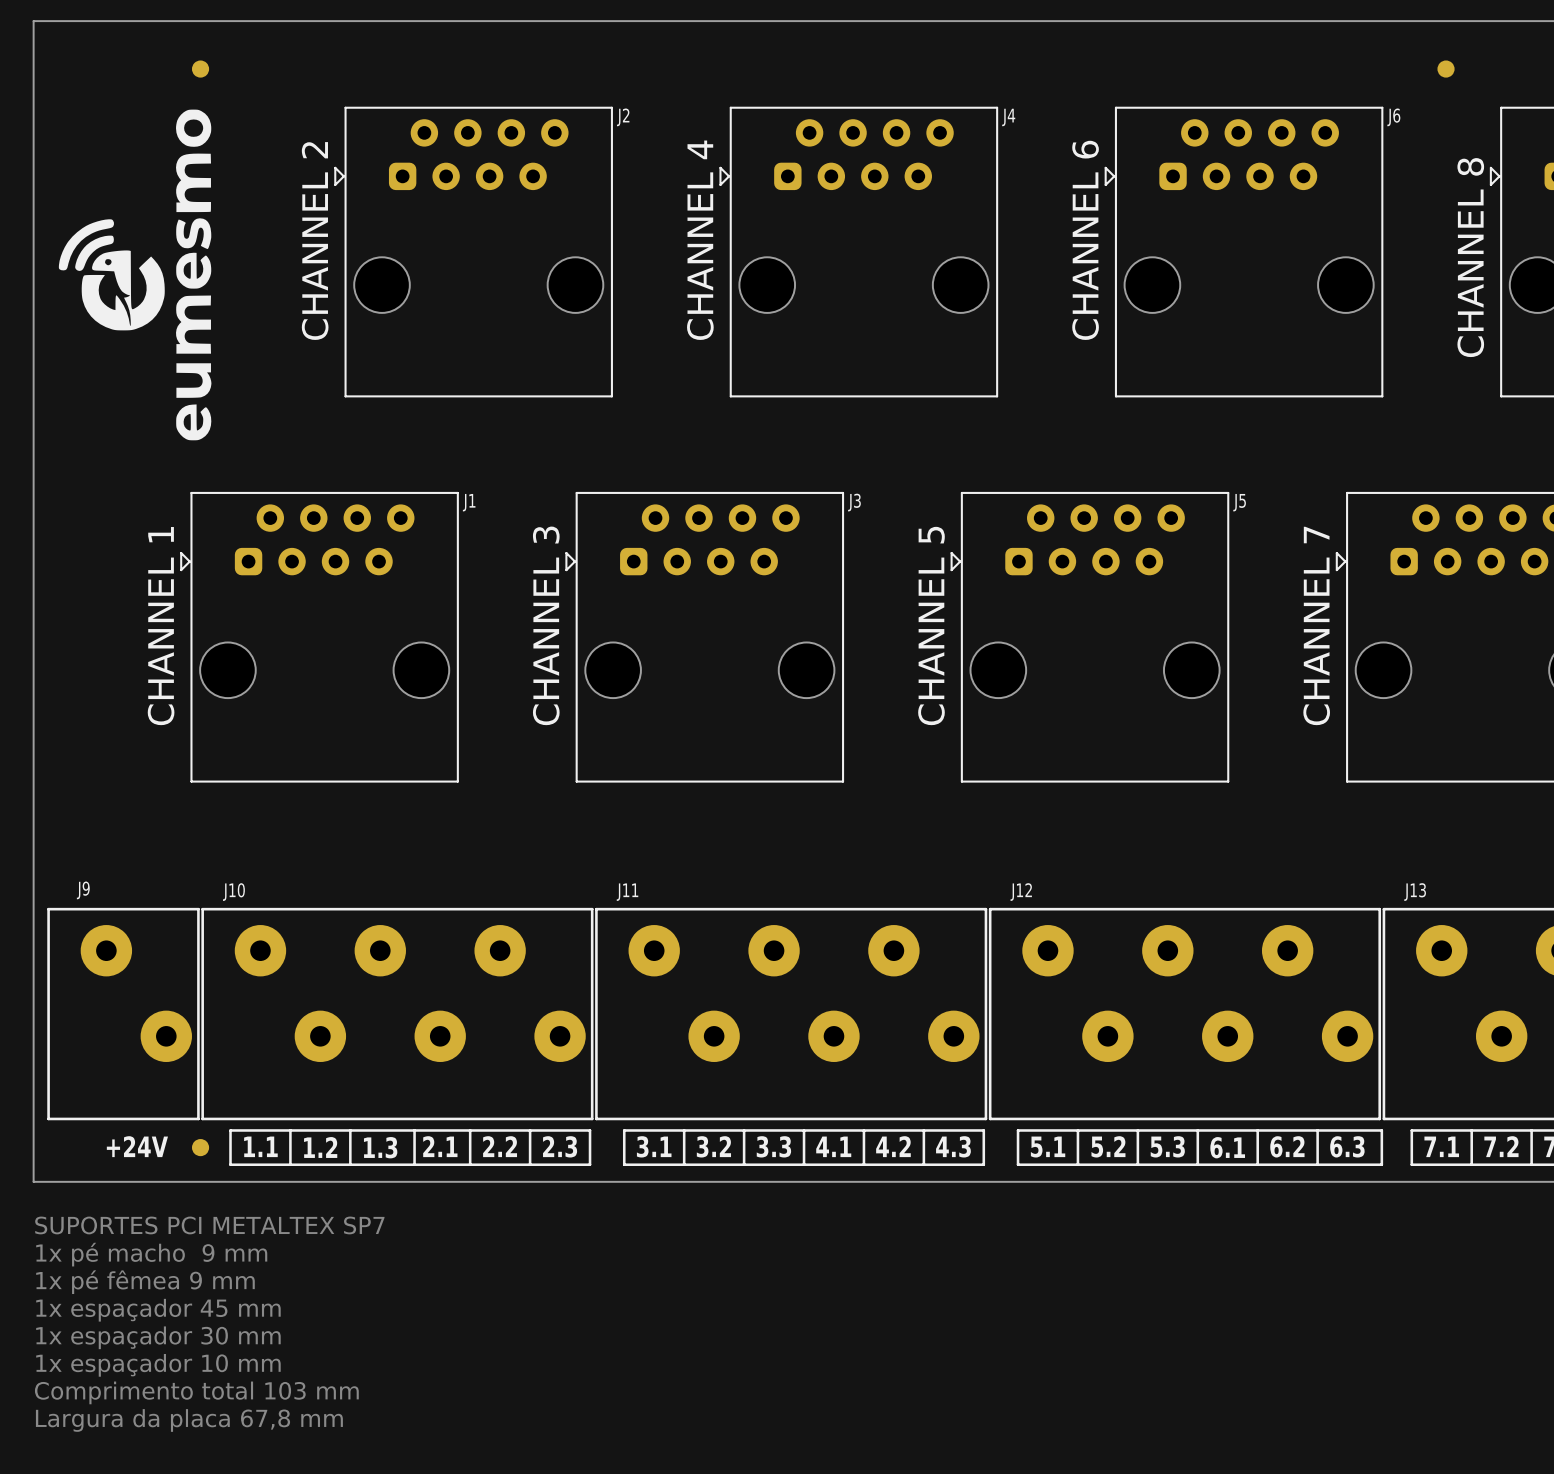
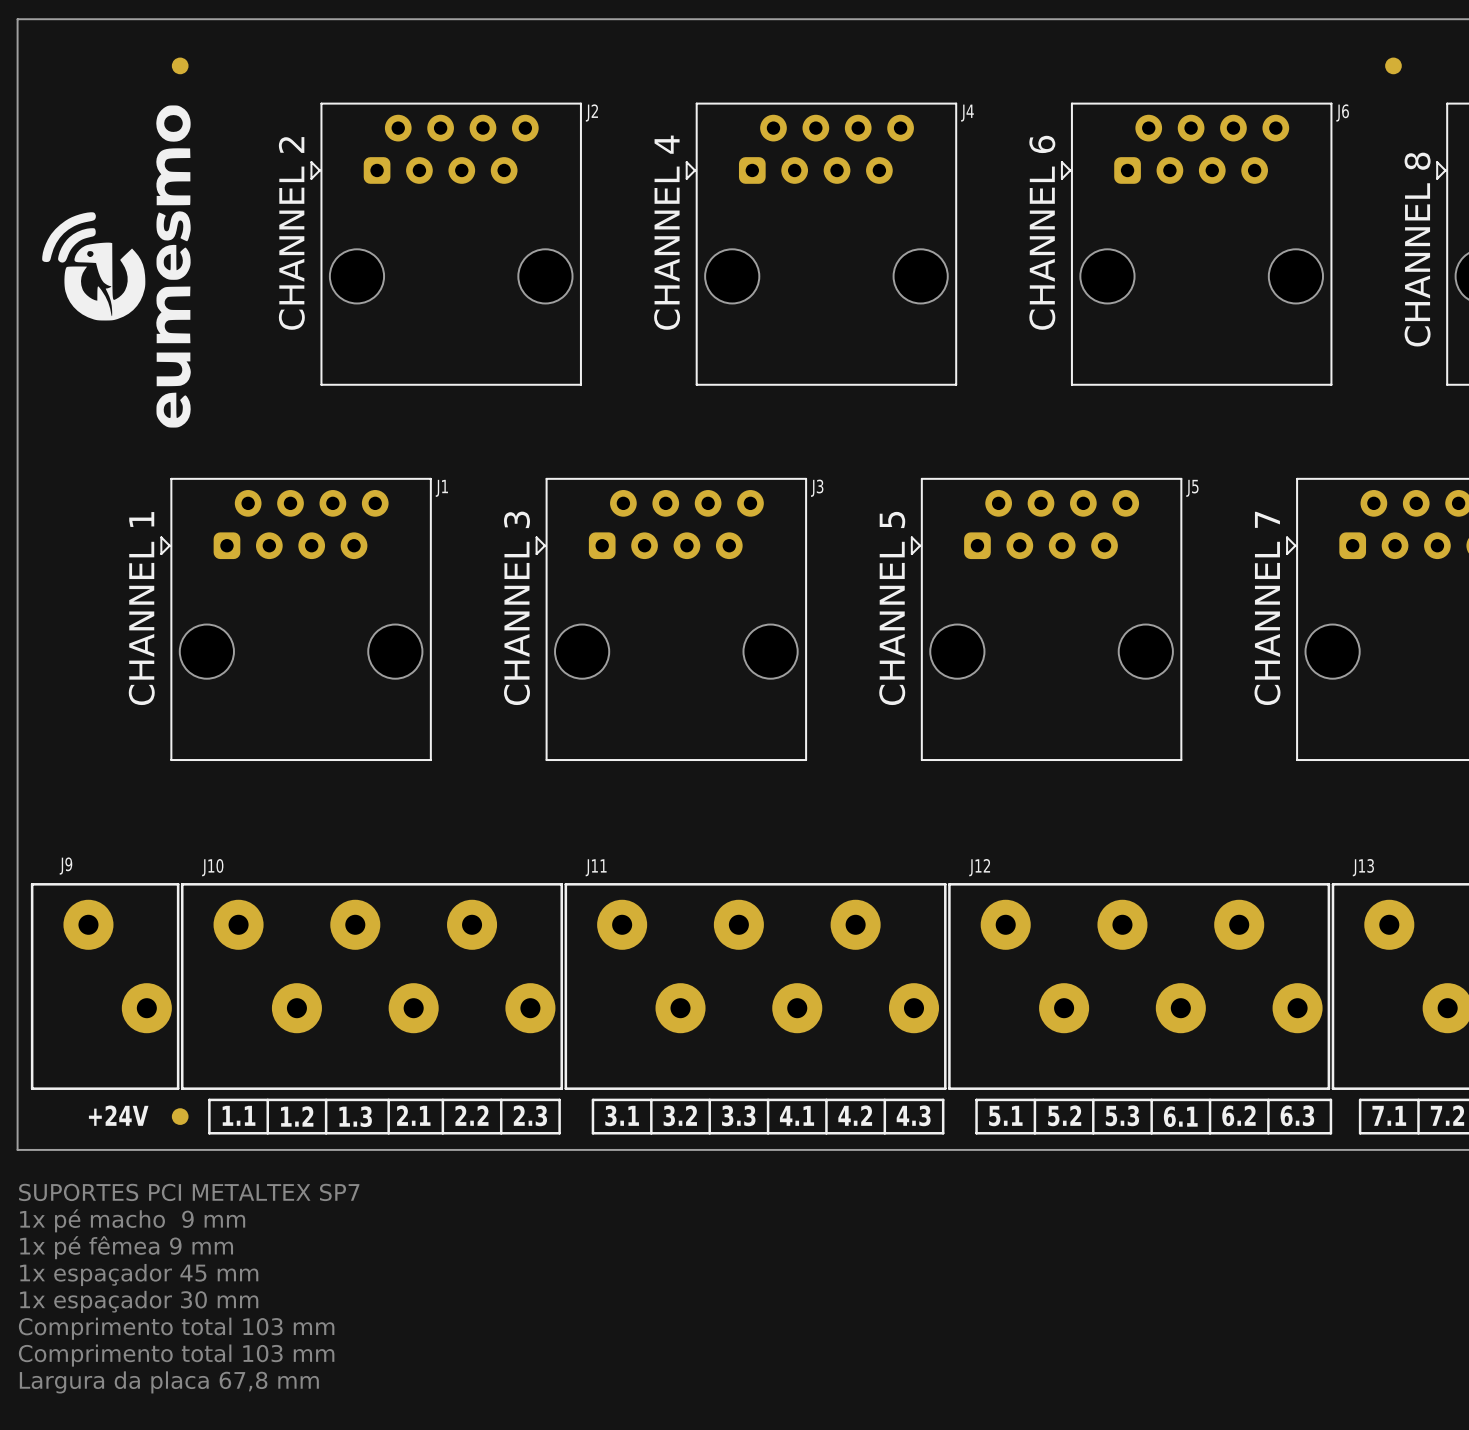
text: 1x espaçador 10 mm (158, 1365) -> Comprimento total 103 mm (176, 1328)

